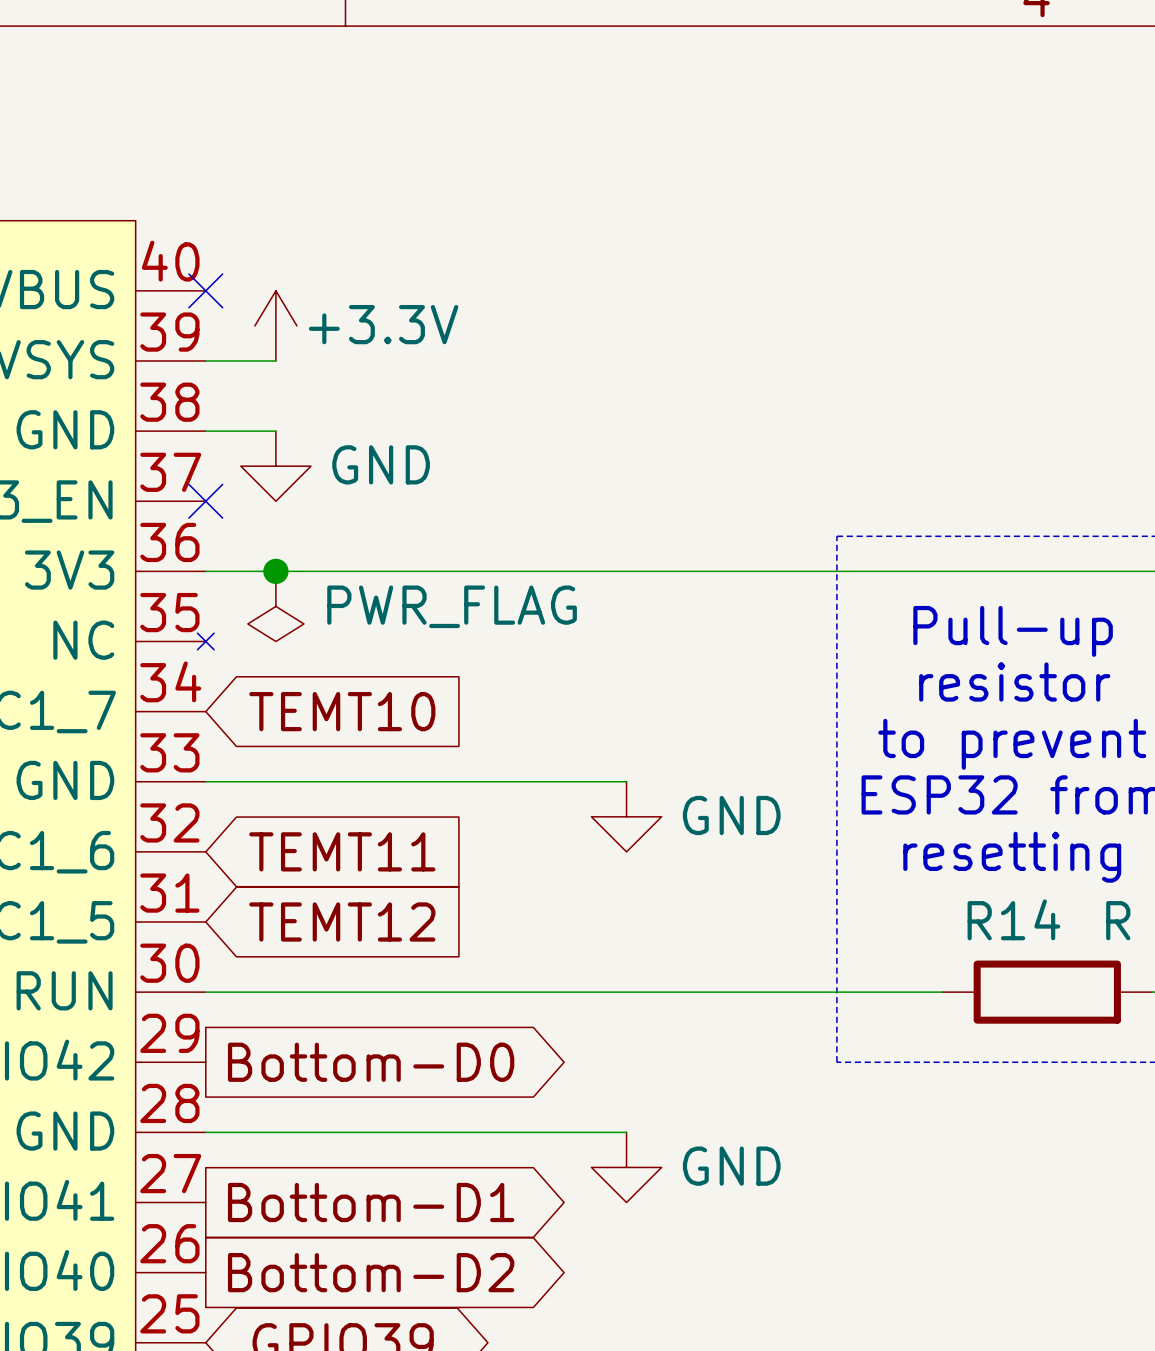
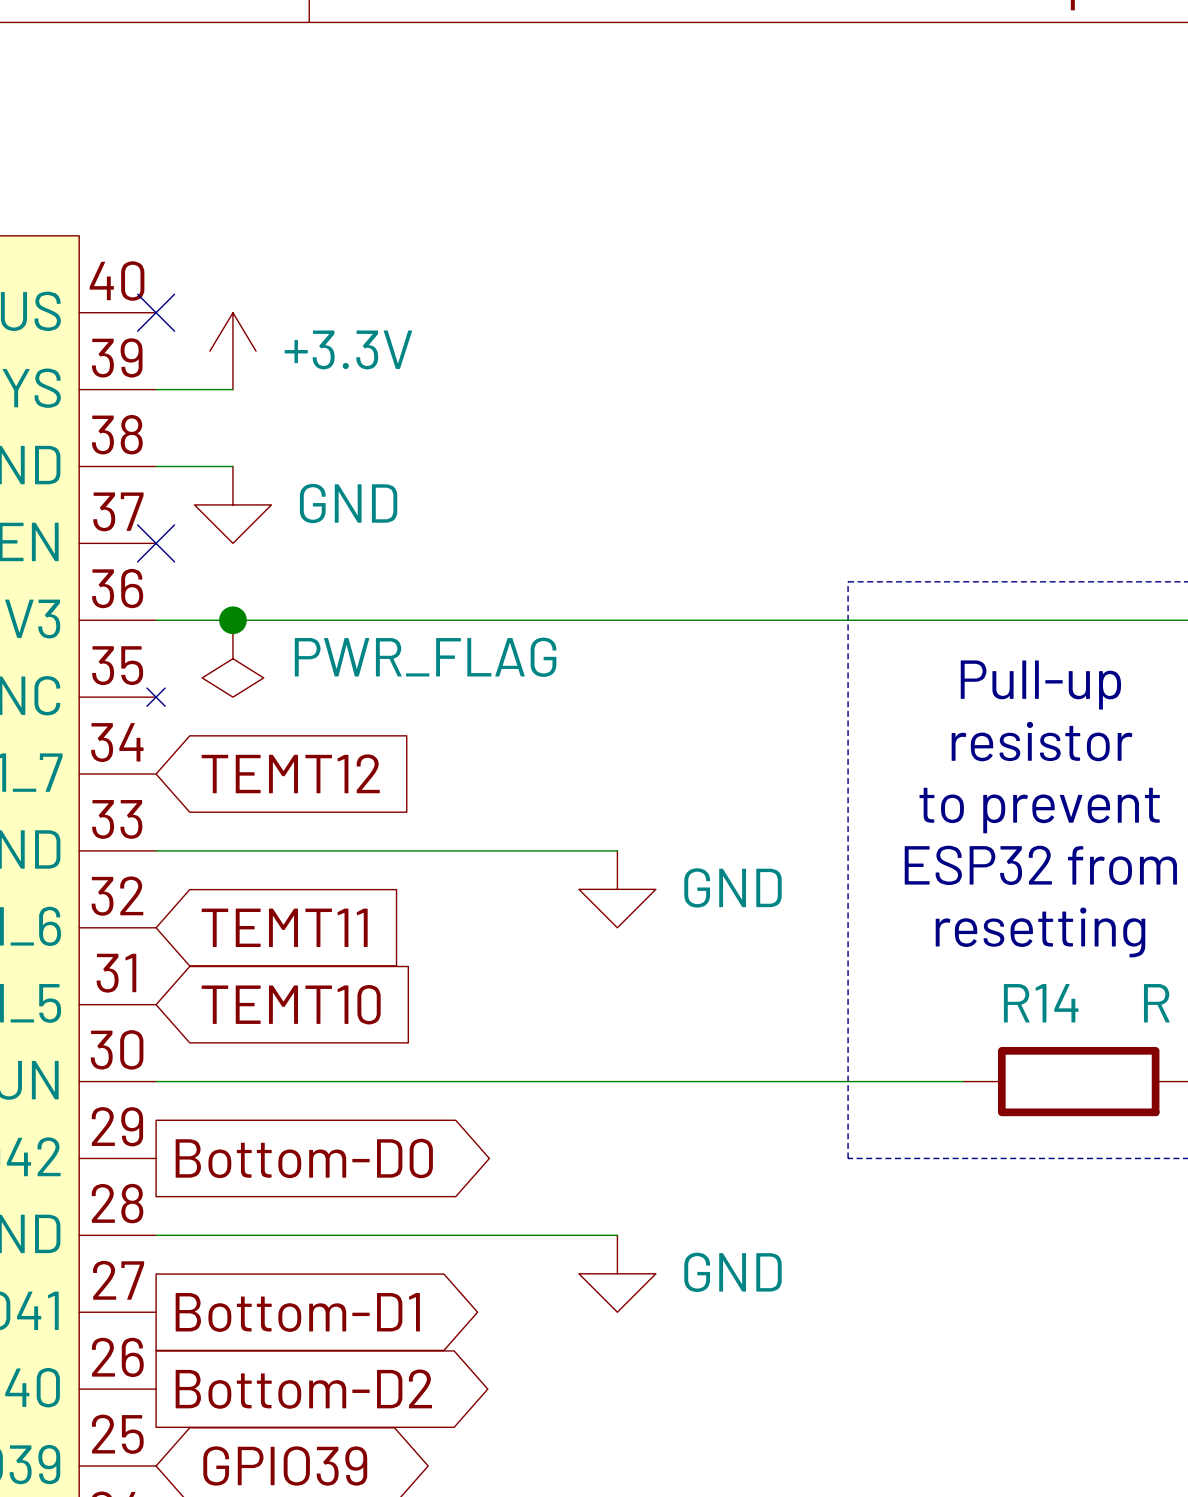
global label: TEMT10 (342, 711) -> TEMT12 (290, 773)
global label: TEMT12 (342, 922) -> TEMT10 (291, 1004)

